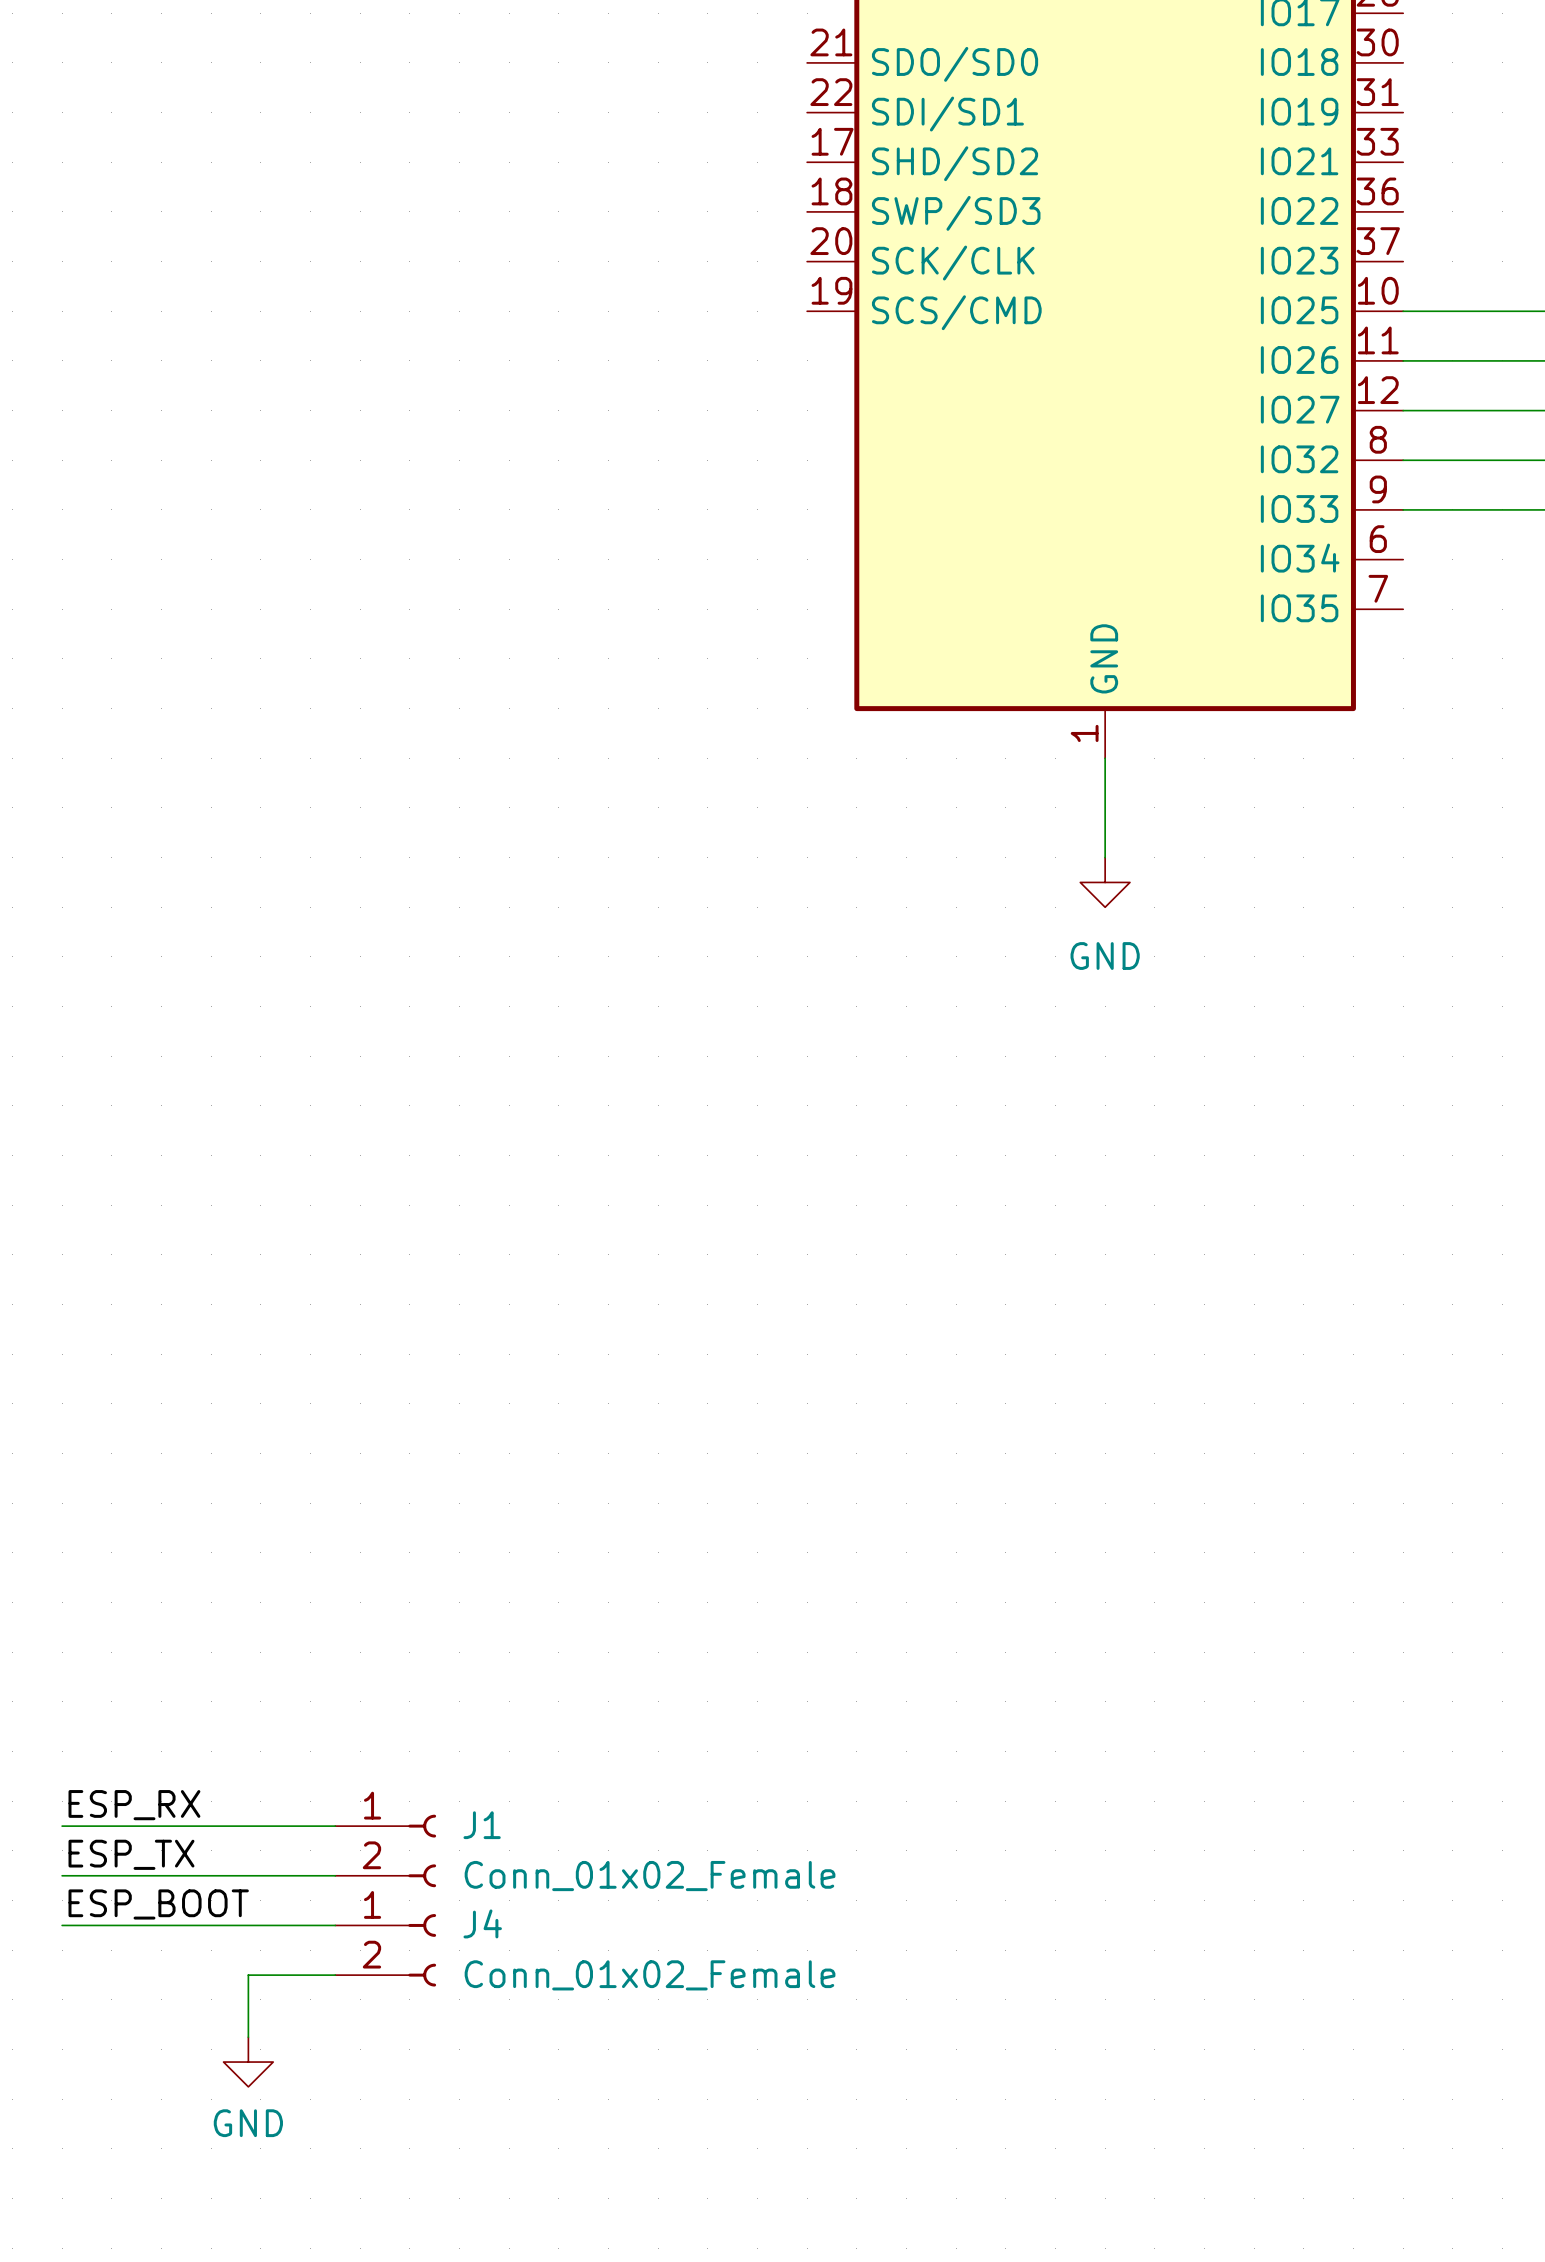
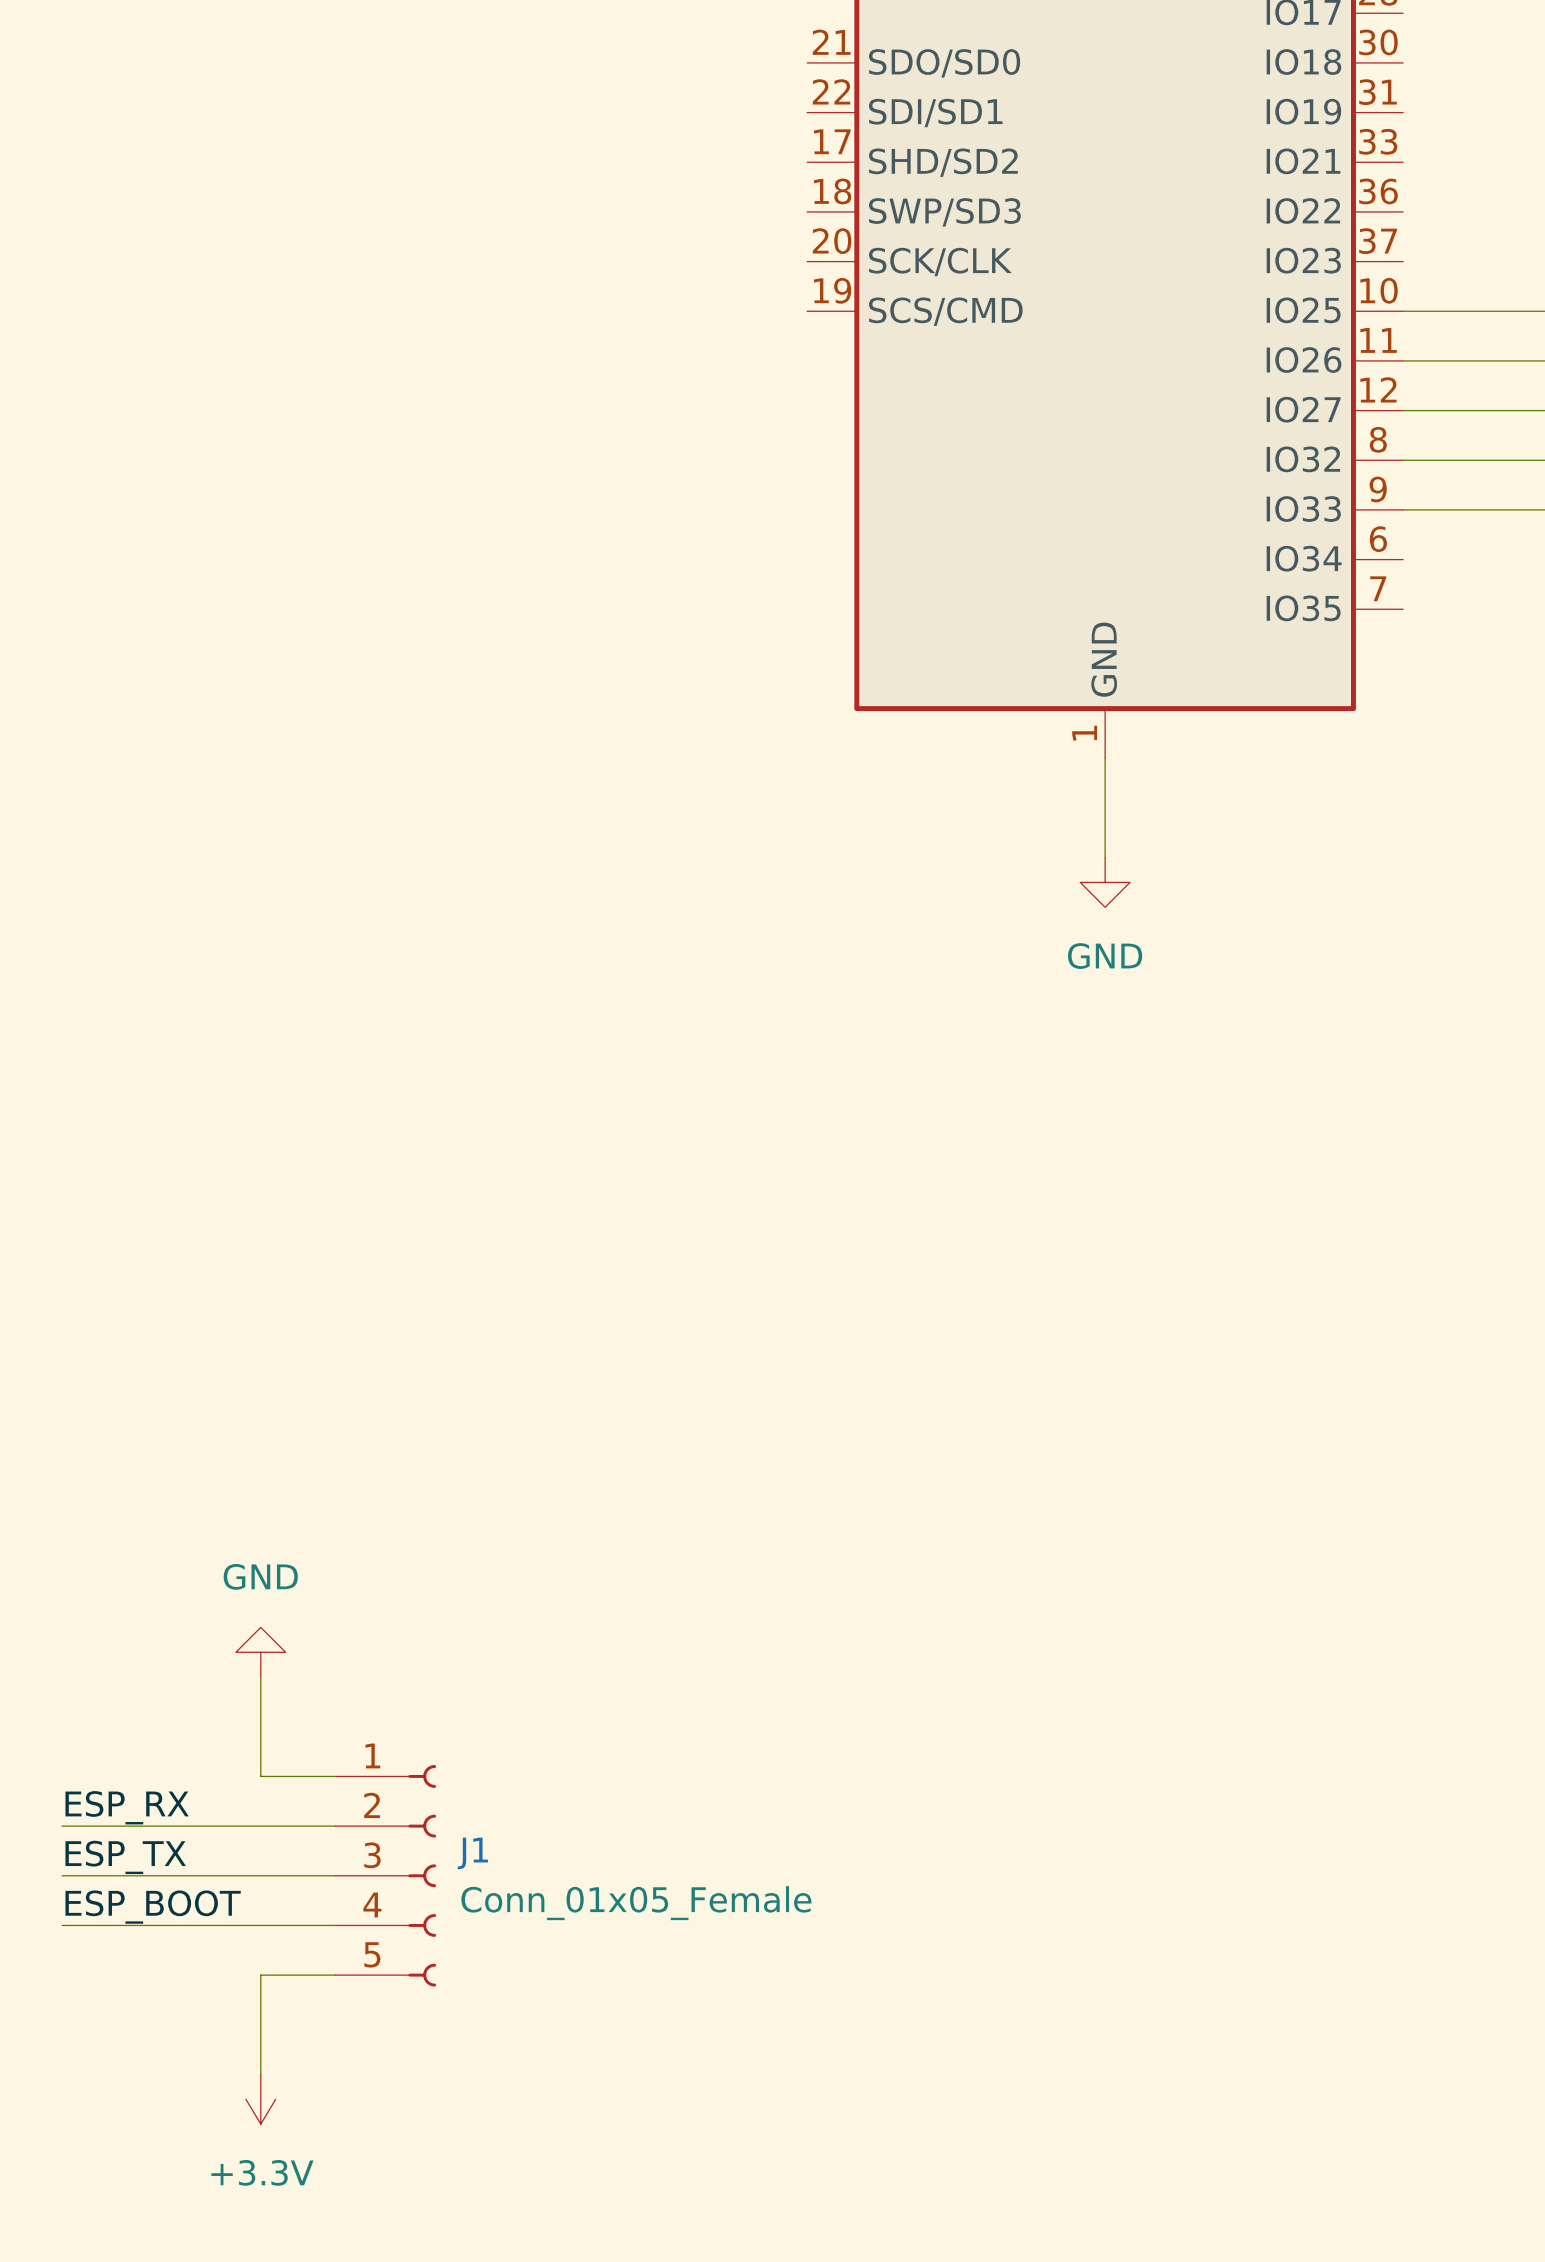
wire: none -> (260, 1677) (260, 1776) (335, 1776)
J1 symbol: [335, 1814, 437, 1888] -> [335, 1765, 437, 1987]
J1 value: Conn_01x02_Female (650, 1876) -> Conn_01x05_Female (636, 1903)
J4: Conn_01x02_Female (385, 1950) -> none
wire: (260, 1975) (248, 1975) (248, 2037) -> (260, 1975) (260, 2074)
power symbol rotation: 0° (248, 2062) -> 180° (260, 1652)
power symbol position: GND (248, 2062) -> GND (260, 1652)
power symbol: none -> +3.3V (260, 2099)

